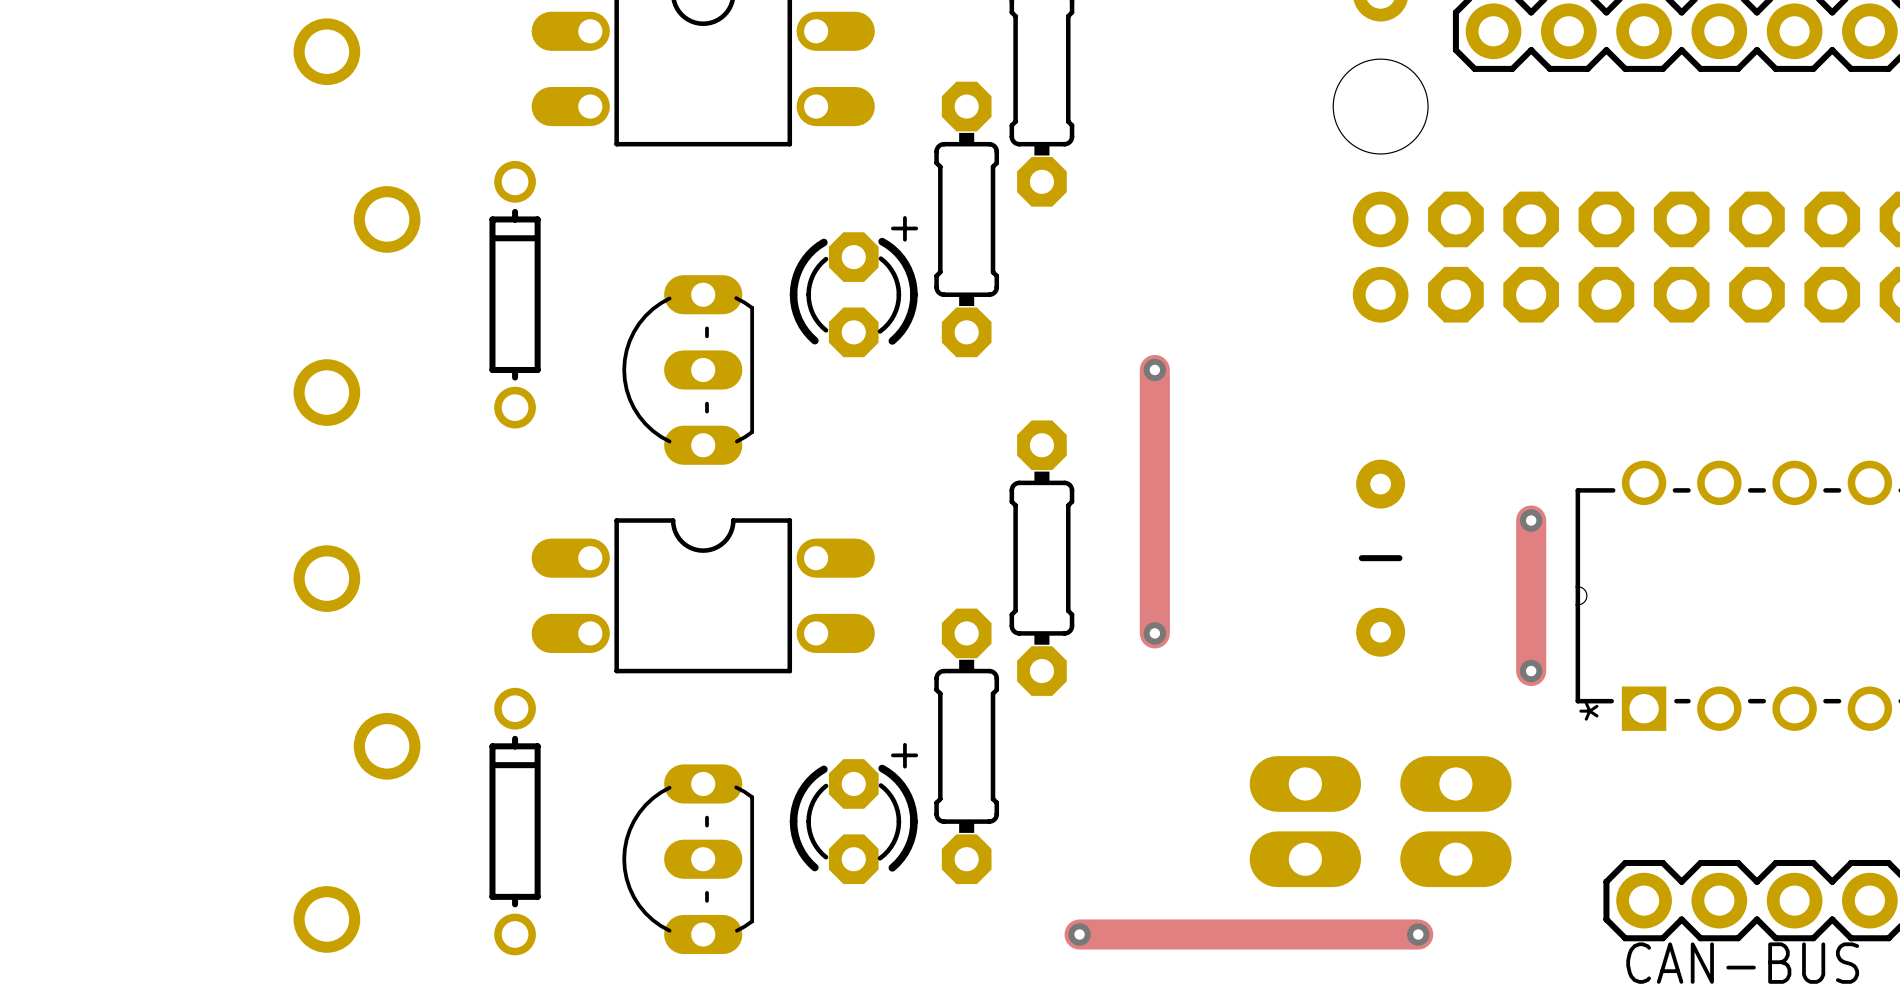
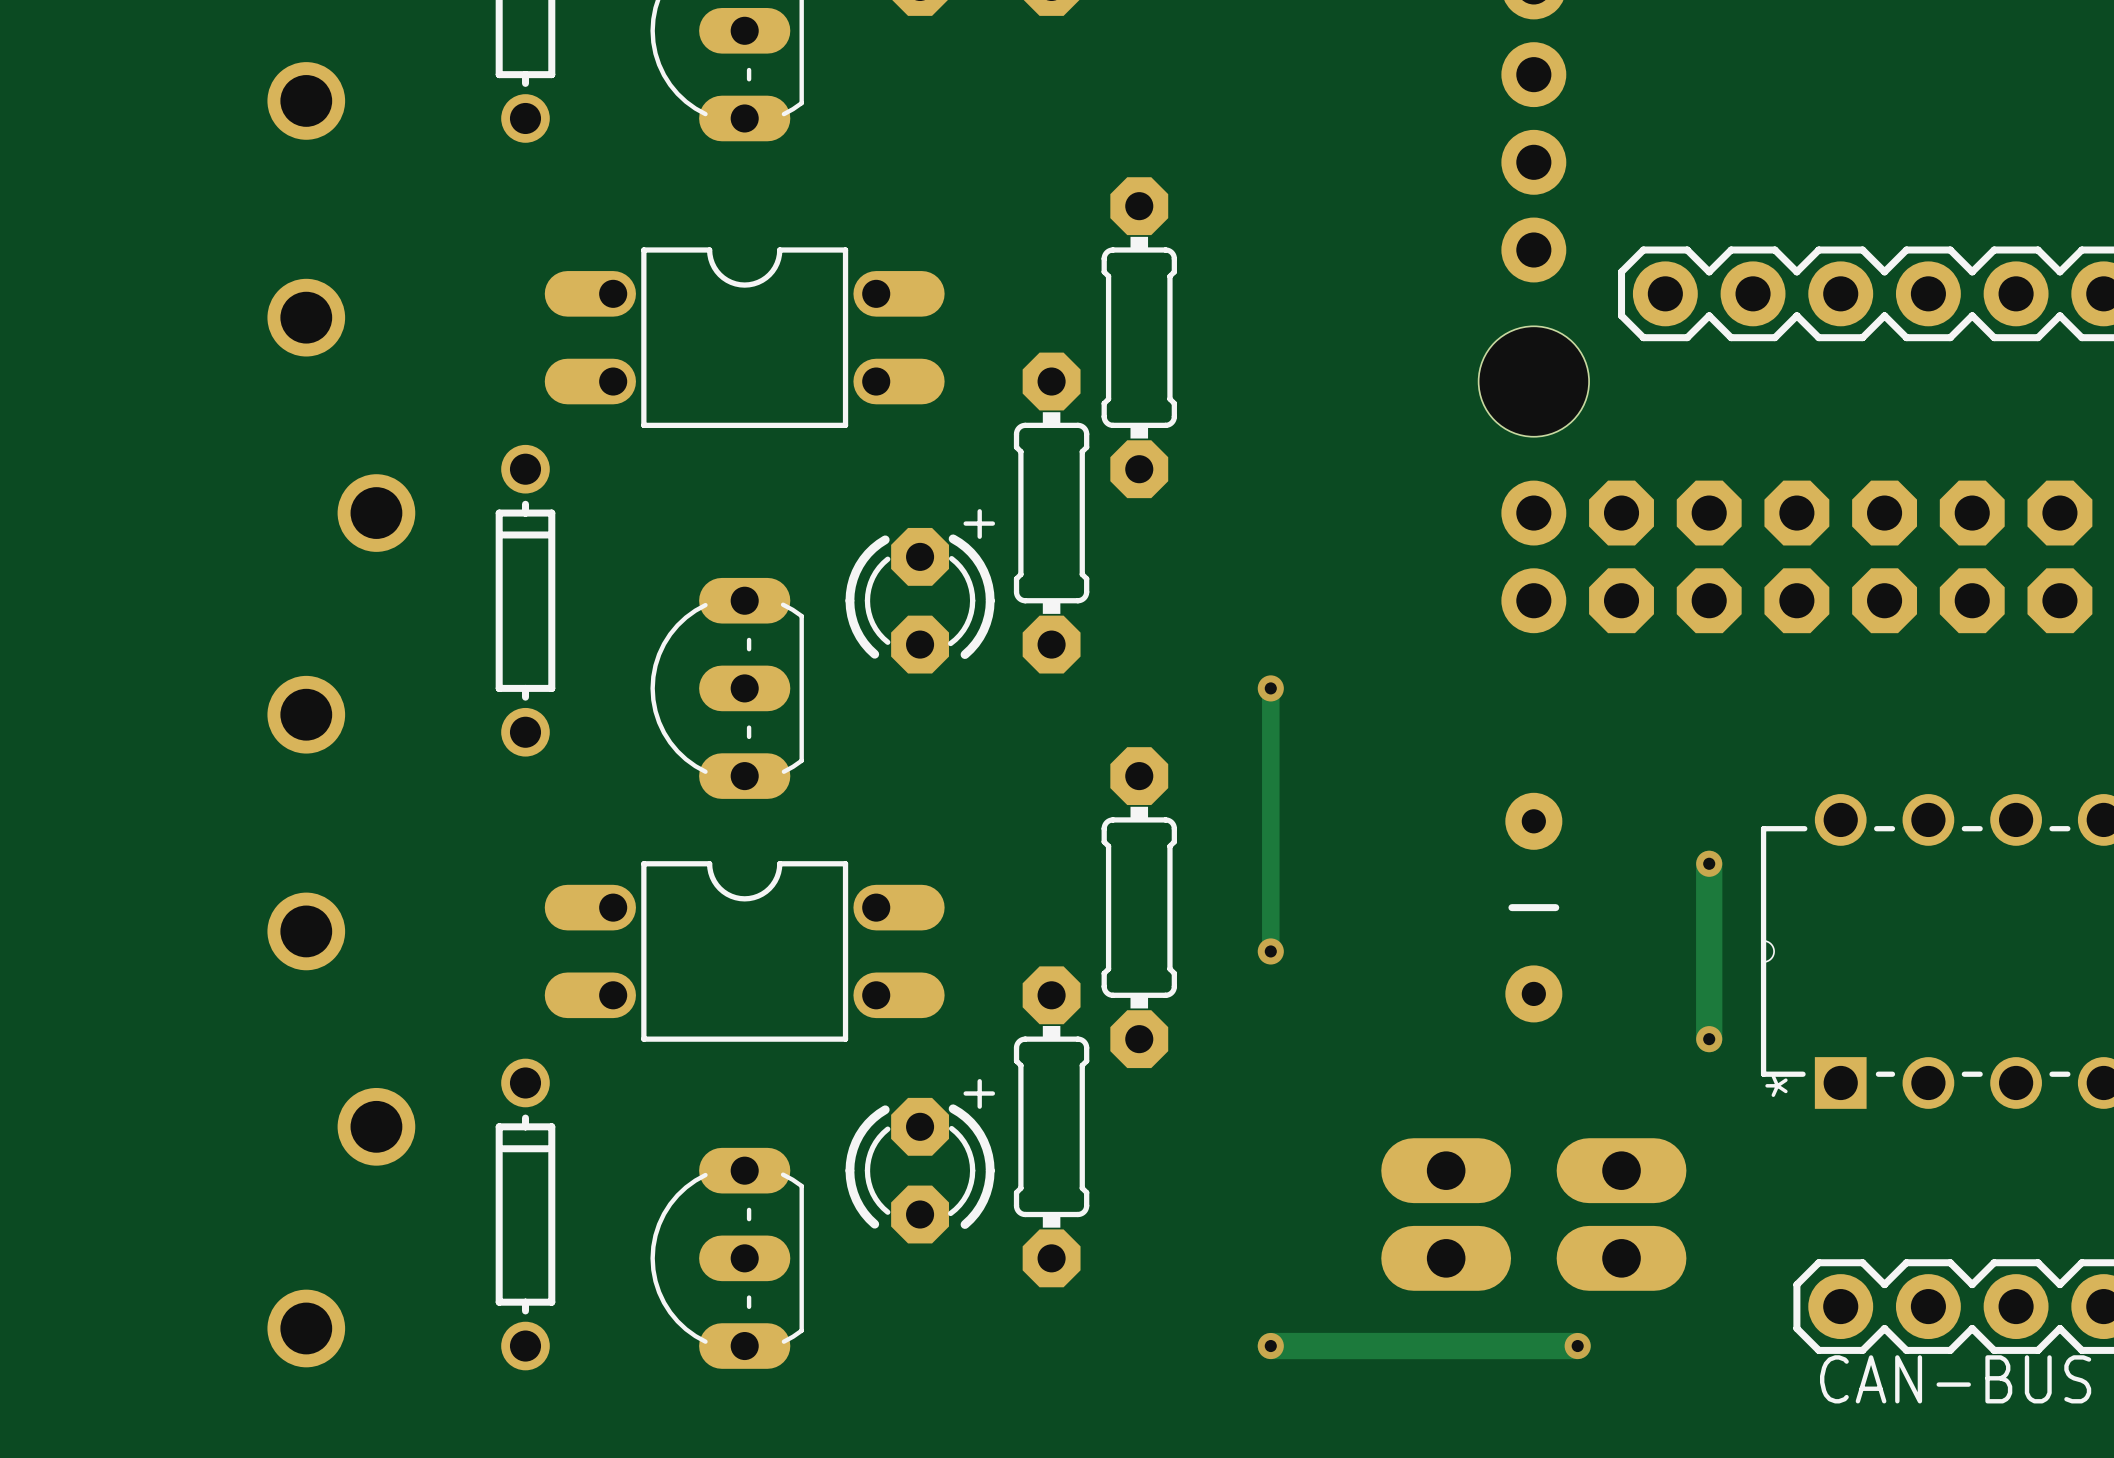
track width: thick (1154, 369) (1154, 595) -> thin (1270, 688) (1270, 951)
track width: thick (1531, 520) (1531, 671) -> thin (1709, 863) (1709, 1039)
track: (1154, 595) (1154, 633) -> none
via position: (1154, 633) -> (1270, 951)
part position: (853, 813) -> (920, 1161)
track: (1079, 934) (1154, 934) -> none
via position: (1079, 934) -> (1270, 1346)
track width: thick (1154, 934) (1418, 934) -> thin (1270, 1346) (1577, 1346)

